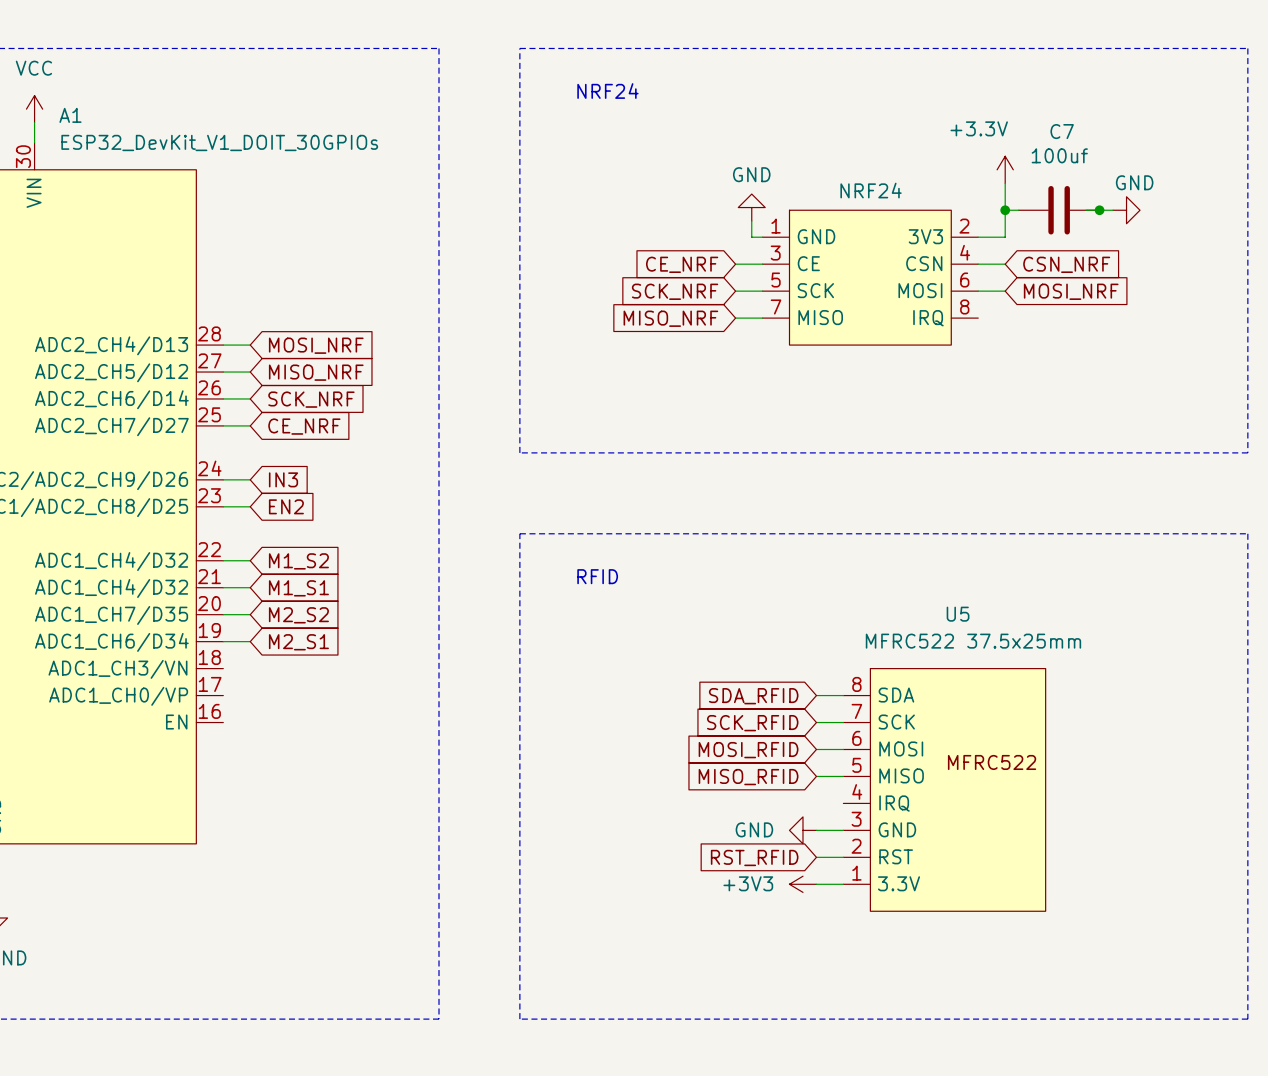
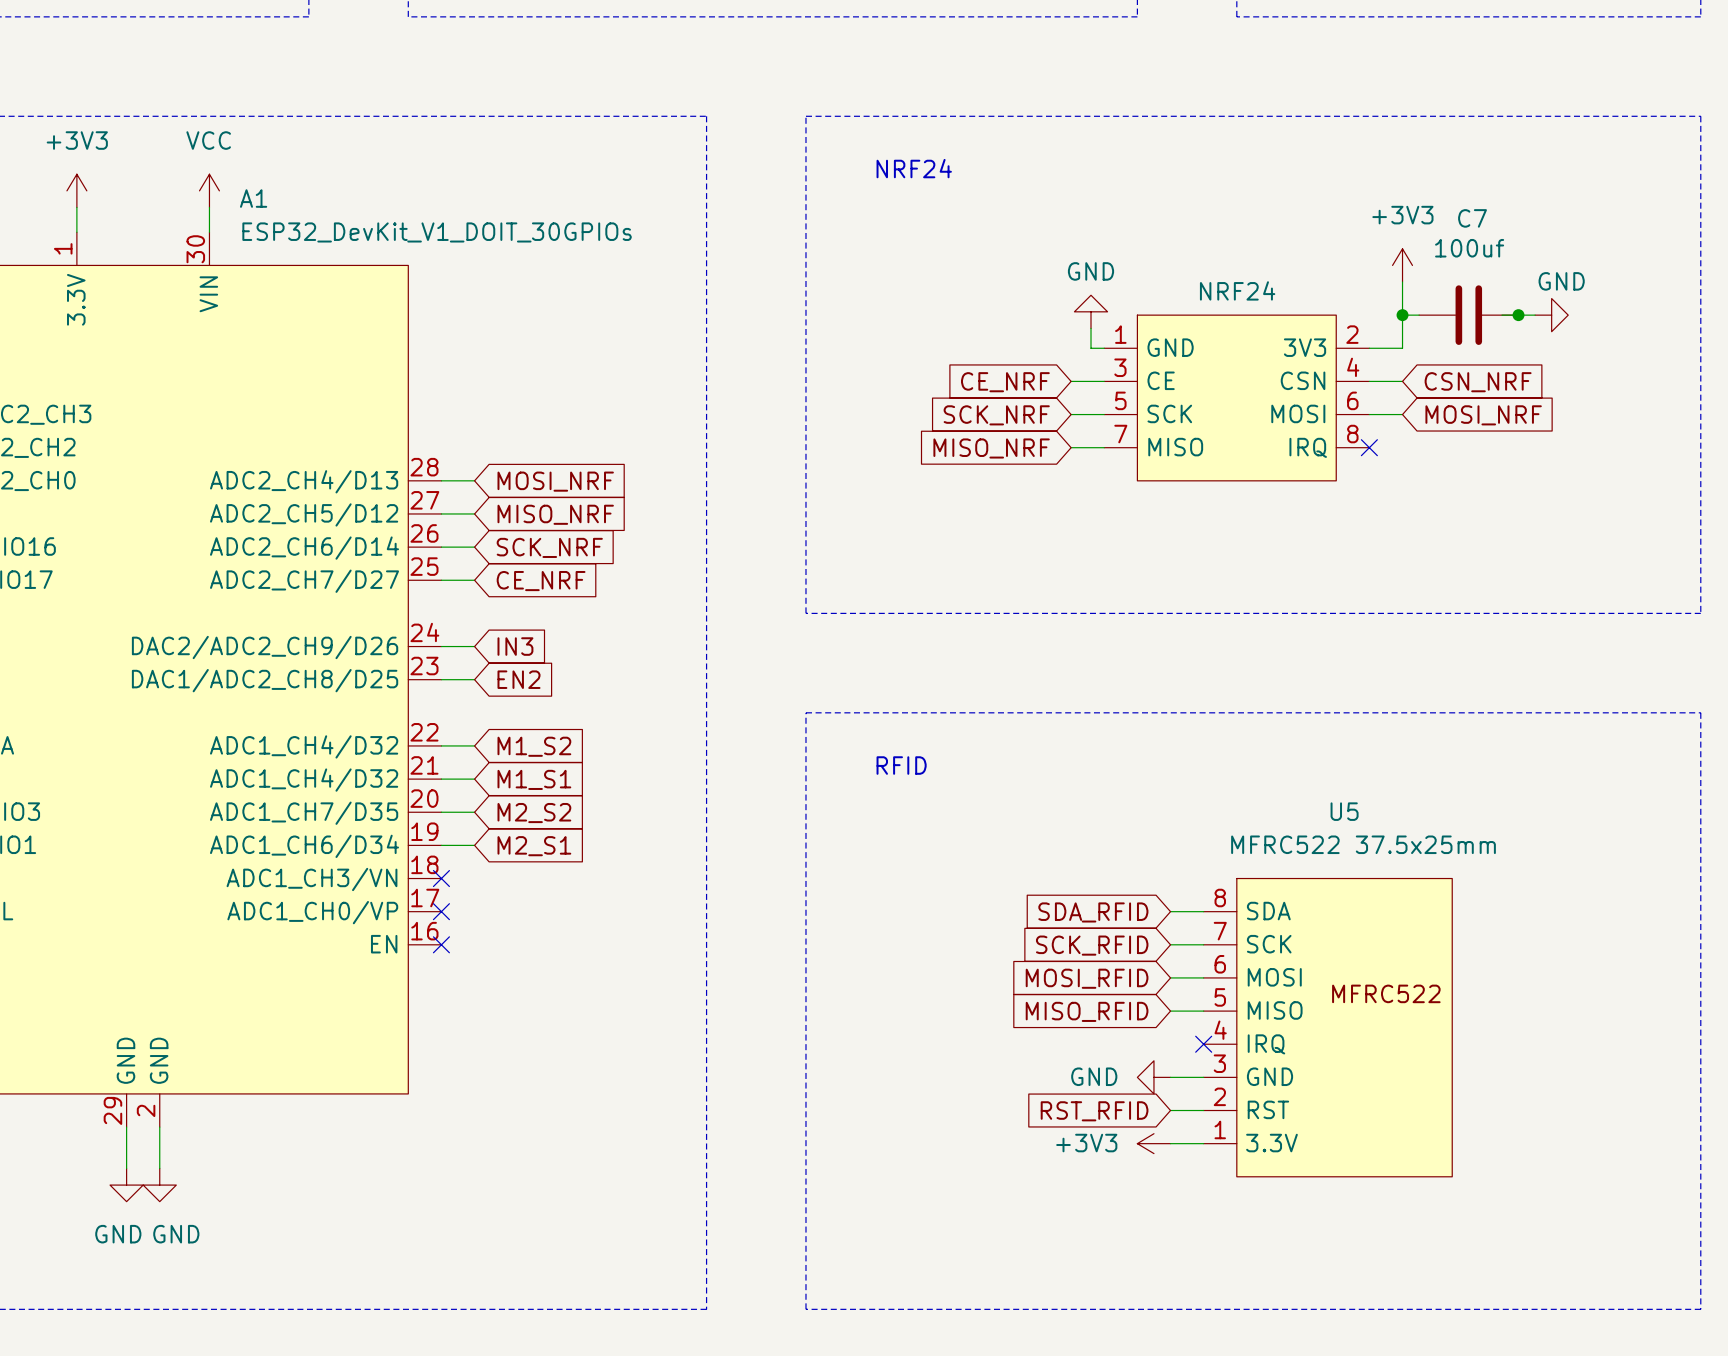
power symbol: +3.3V (1005, 169) -> +3V3 (1402, 265)
no-connect mark: none -> (1369, 447)
no-connect mark: none -> (441, 878)
no-connect mark: none -> (441, 911)
no-connect mark: none -> (441, 944)
no-connect mark: none -> (1203, 1044)

